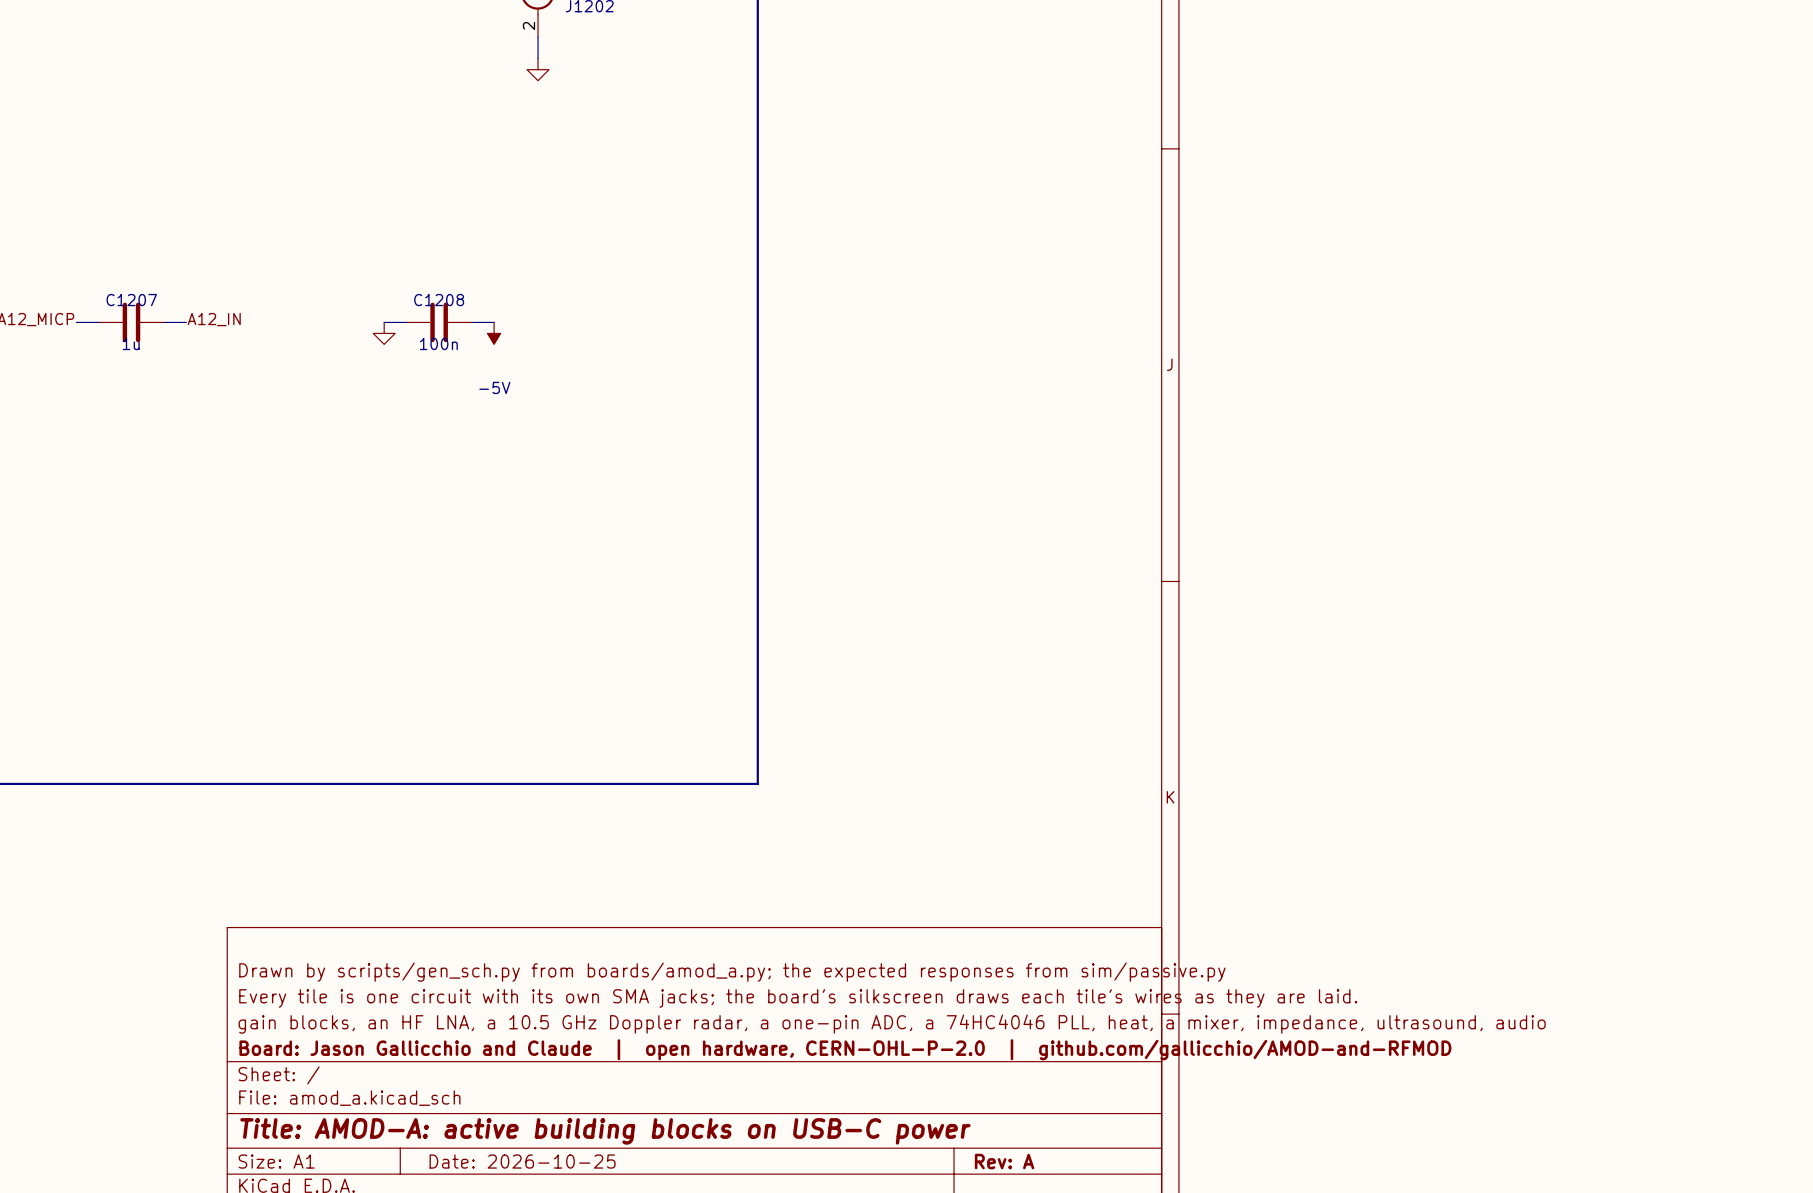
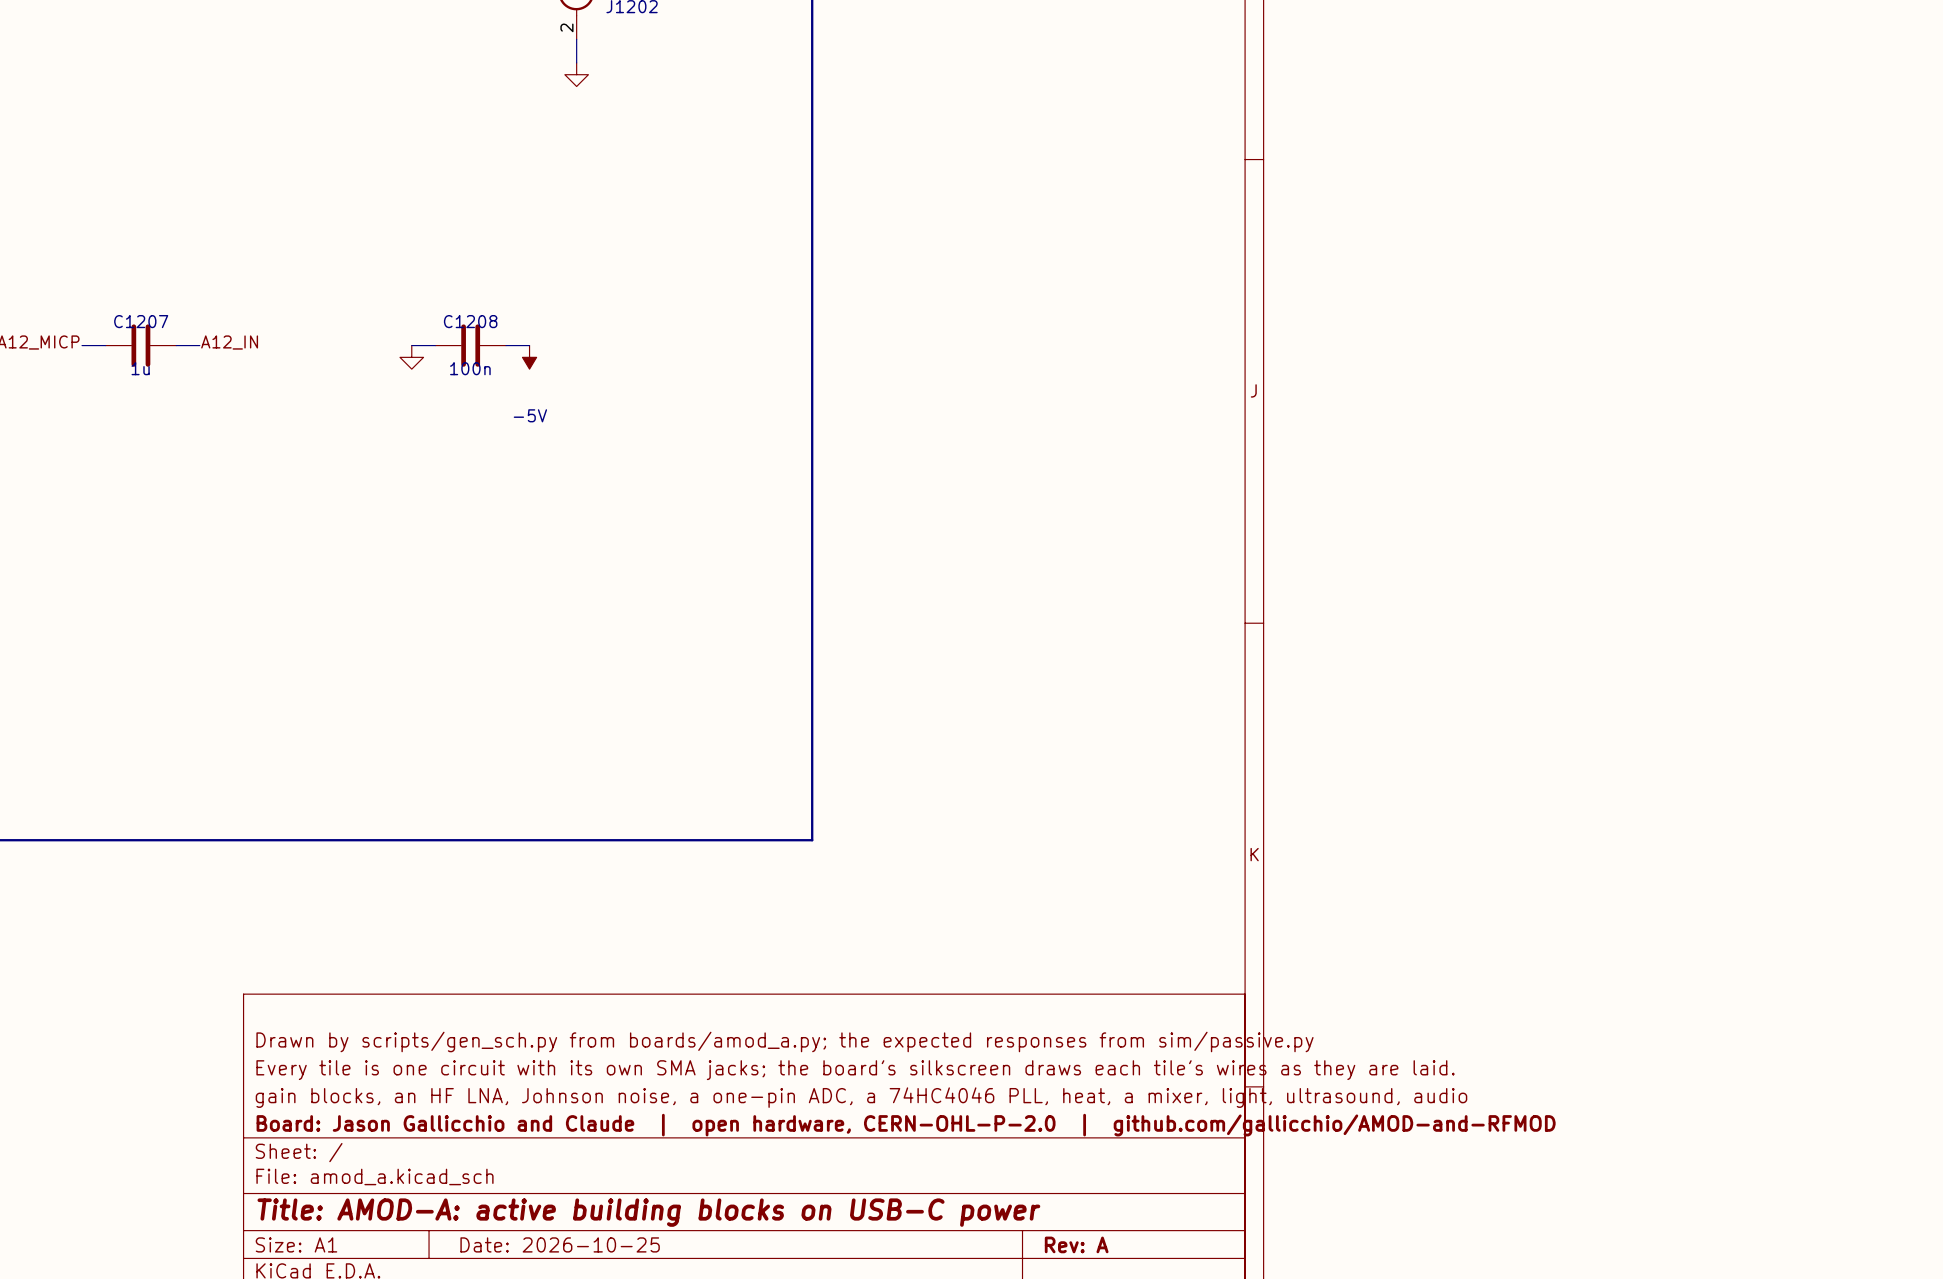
title block: gain blocks, an HF LNA, a 10.5 GHz Doppler radar, a one-pin ADC, a 74HC4046 PLL, heat, a mixer, impedance, ultrasound, audio (892, 1024) -> gain blocks, an HF LNA, Johnson noise, a one-pin ADC, a 74HC4046 PLL, heat, a mixer, light, ultrasound, audio (861, 1097)

